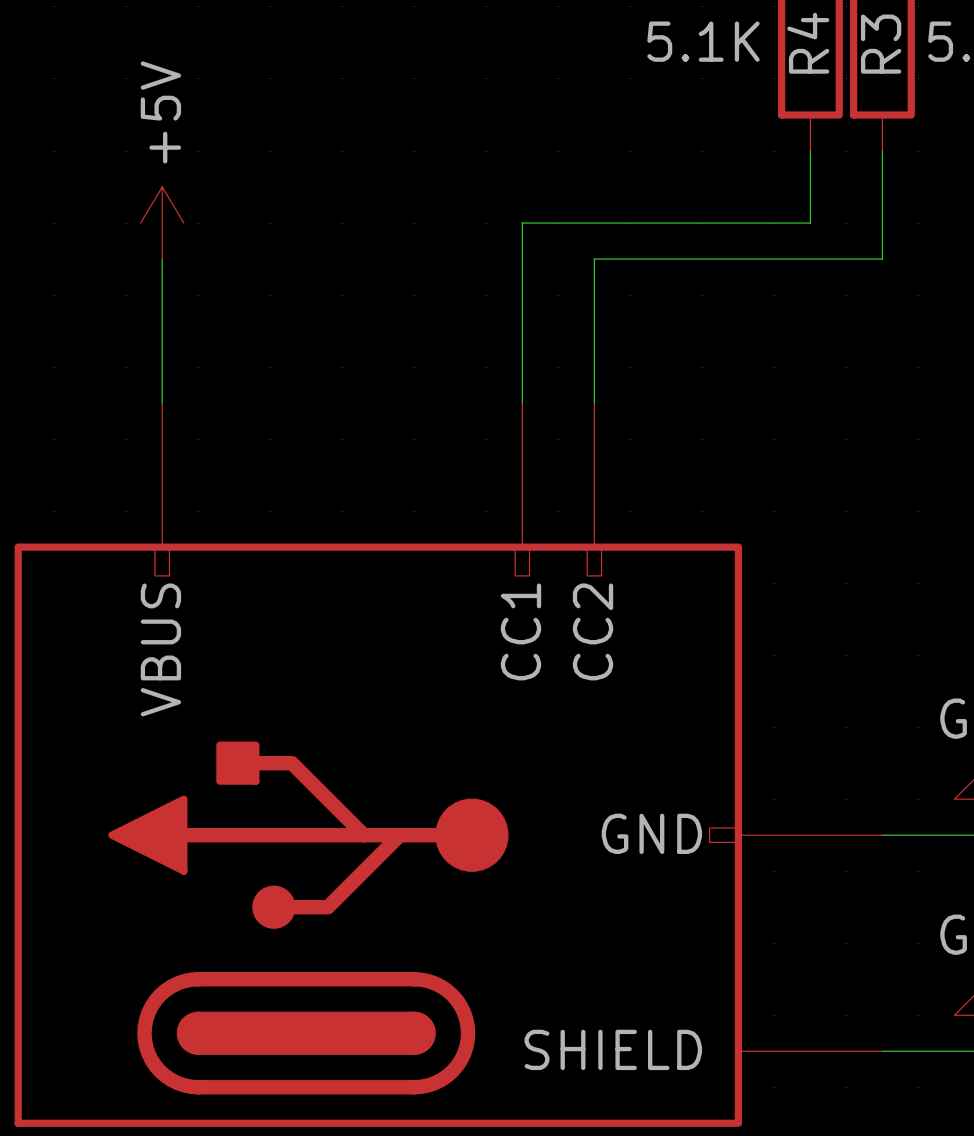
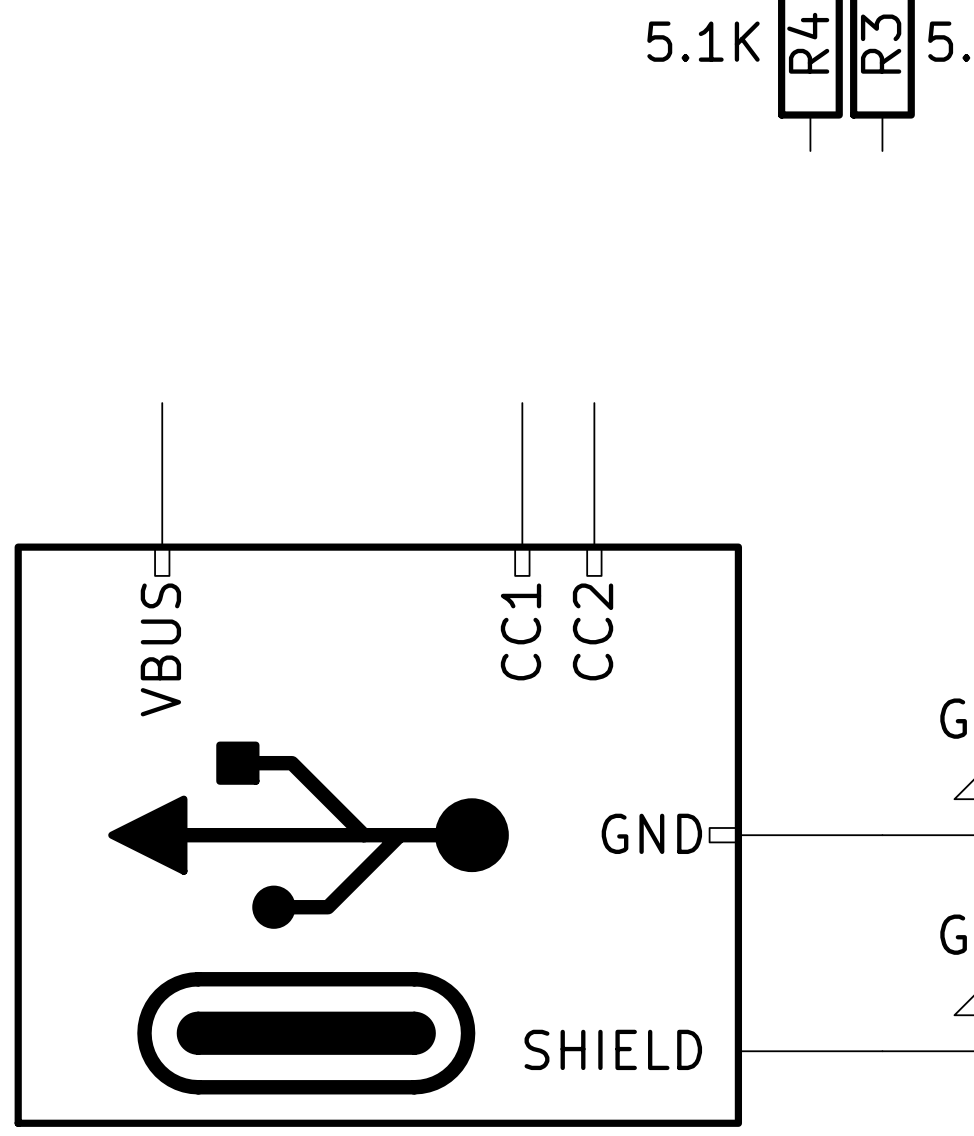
wire: (810, 151) (810, 223) (522, 223) (522, 403) -> none
wire: (882, 151) (882, 259) (594, 259) (594, 403) -> none
power symbol: +5V (162, 223) -> none
wire: (162, 259) (162, 403) -> none

